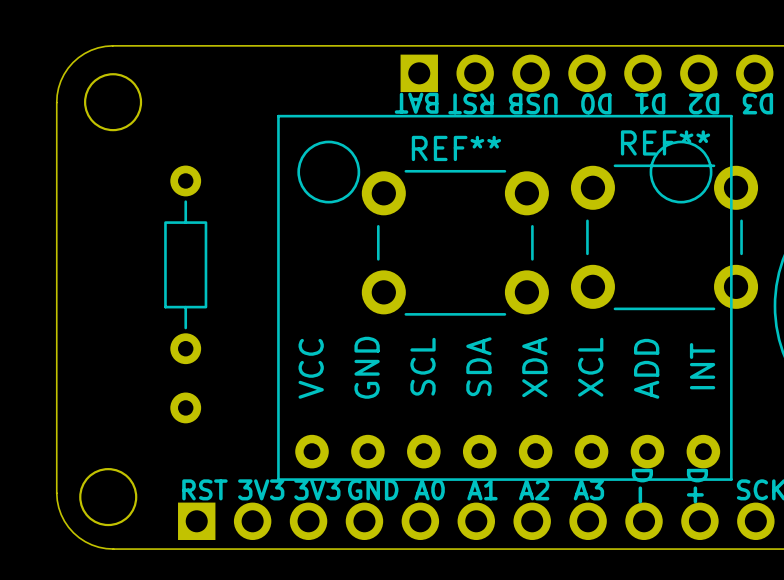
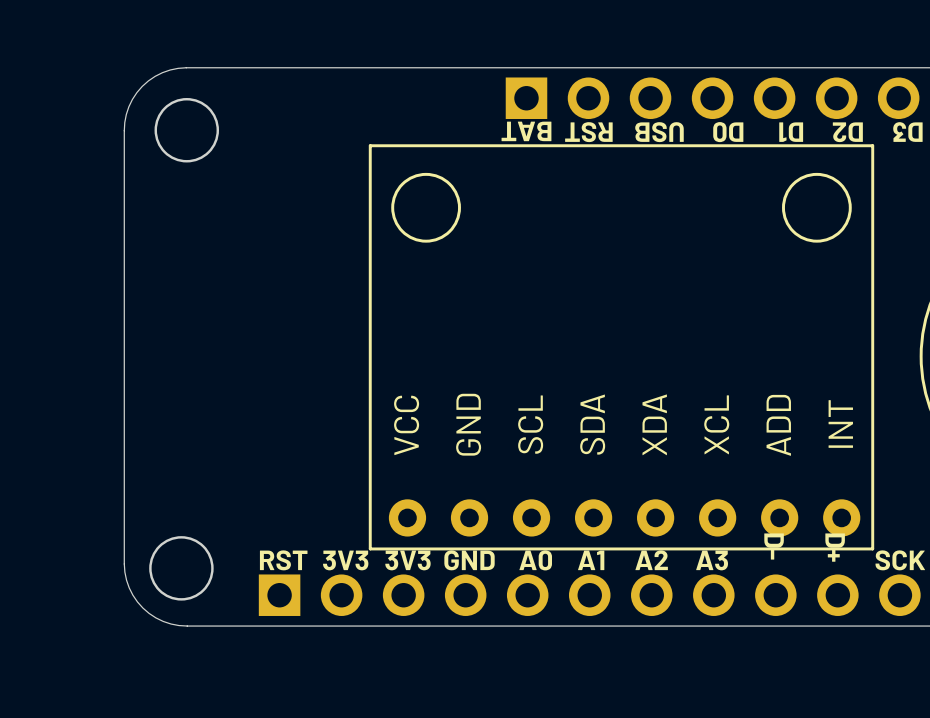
REF**: (664, 237) -> none
REF**: (455, 242) -> none
part: (185, 264) -> none
part: (185, 407) -> none

